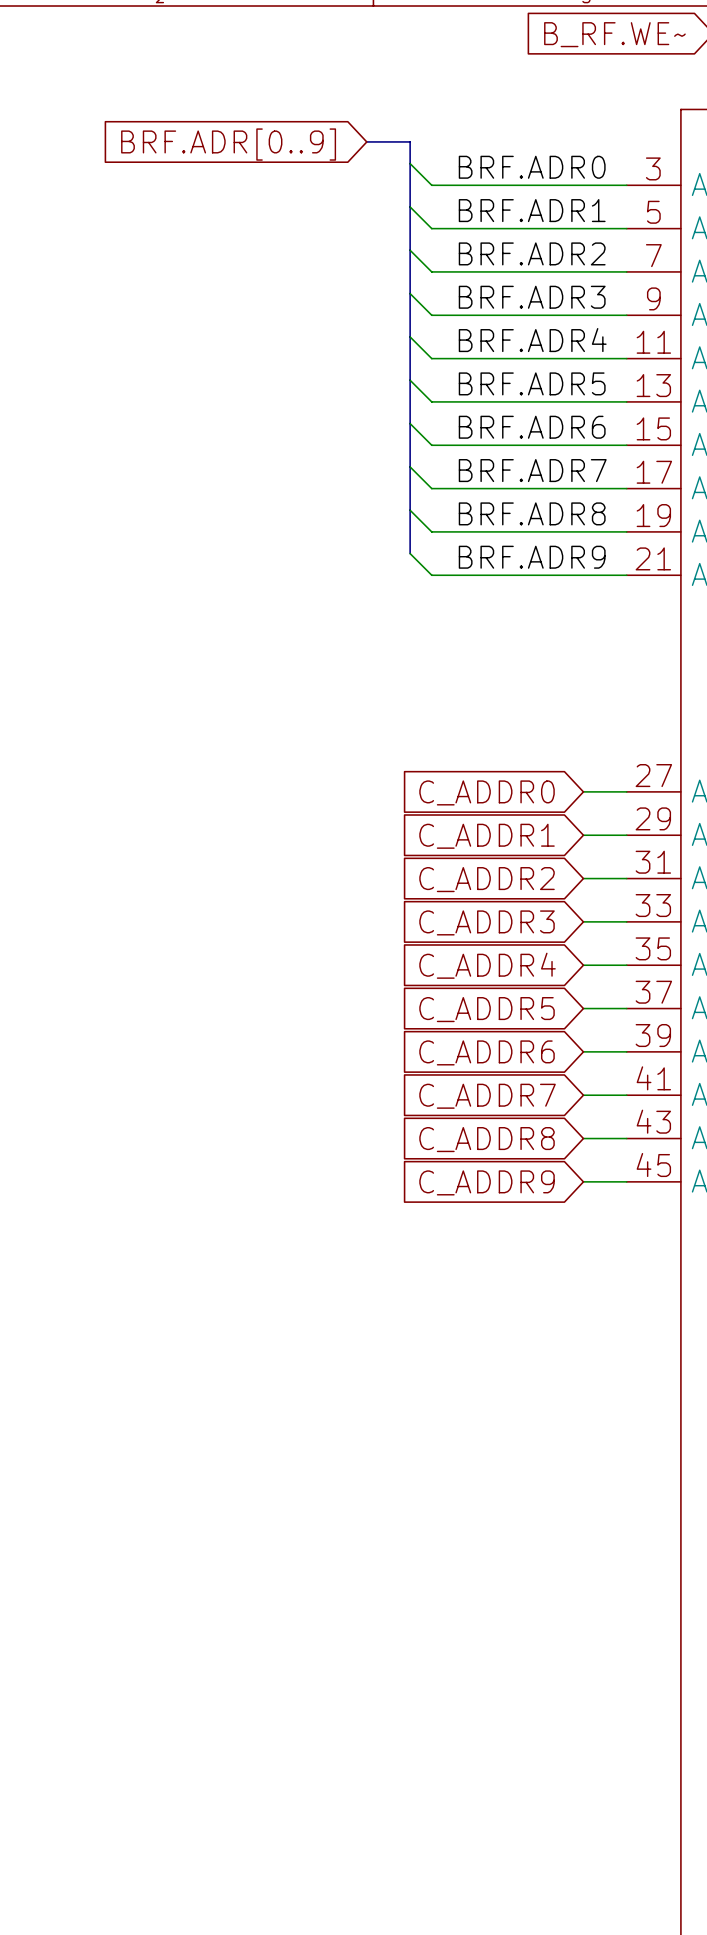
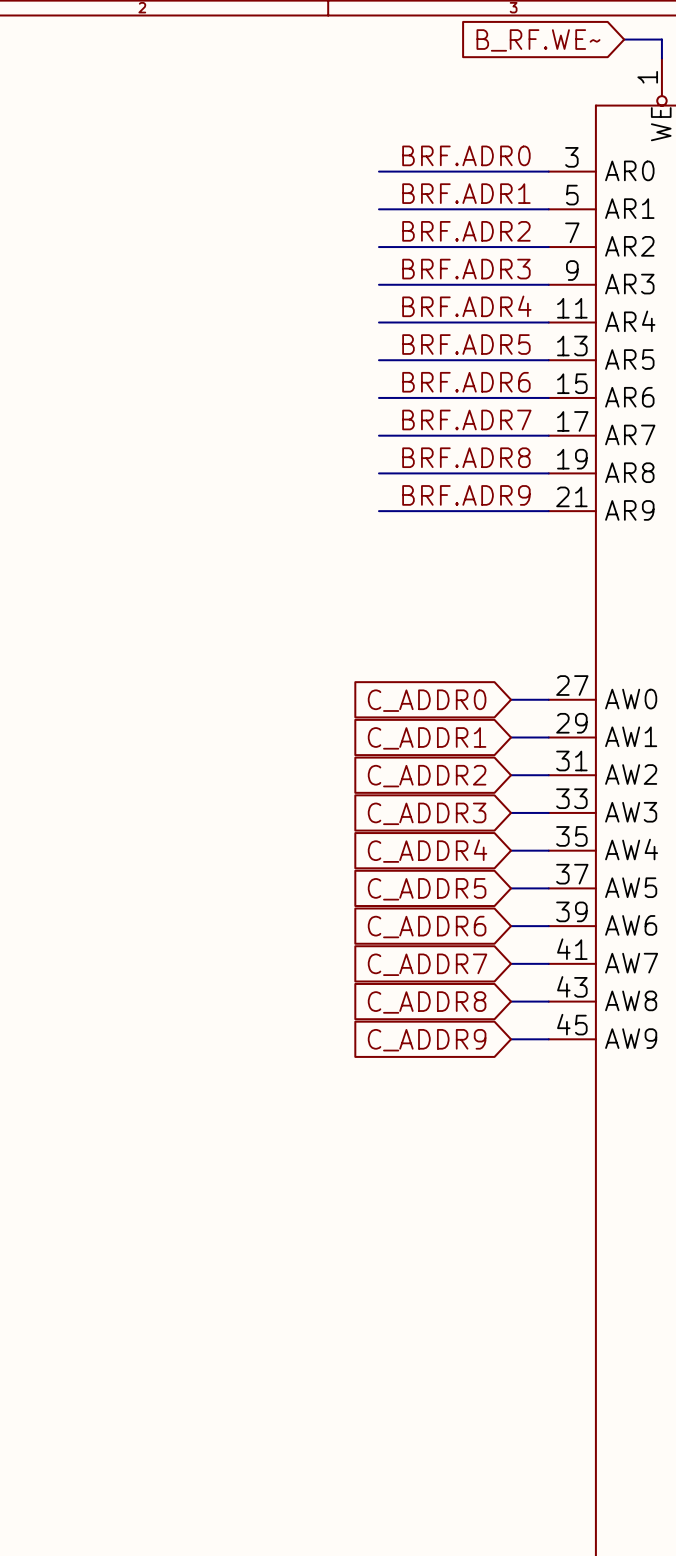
bus: (366, 141) (410, 141) (410, 553) -> none
global label: BRF.ADR[0..9] (228, 144) -> none
wire: (410, 163) (431, 185) -> none
wire: (410, 206) (431, 228) -> none
wire: (410, 250) (431, 271) -> none
wire: (410, 293) (431, 315) -> none
wire: (410, 336) (431, 358) -> none
wire: (410, 380) (431, 401) -> none
wire: (410, 423) (431, 445) -> none
wire: (410, 466) (431, 488) -> none
wire: (410, 510) (431, 531) -> none
wire: (410, 553) (431, 575) -> none

